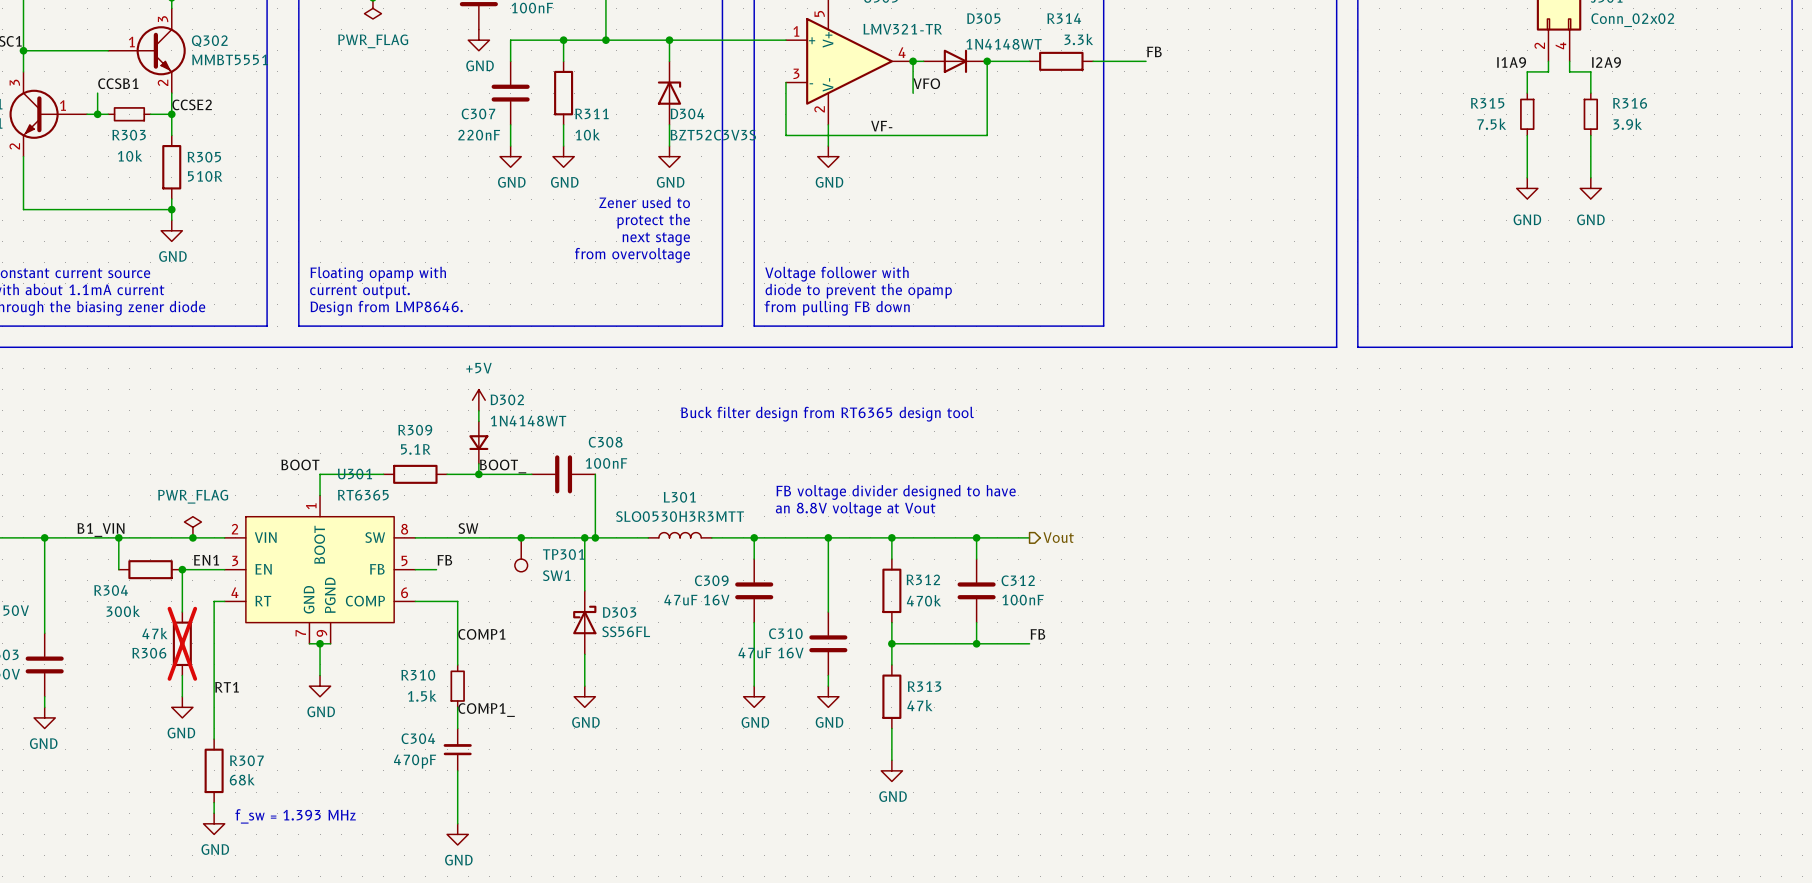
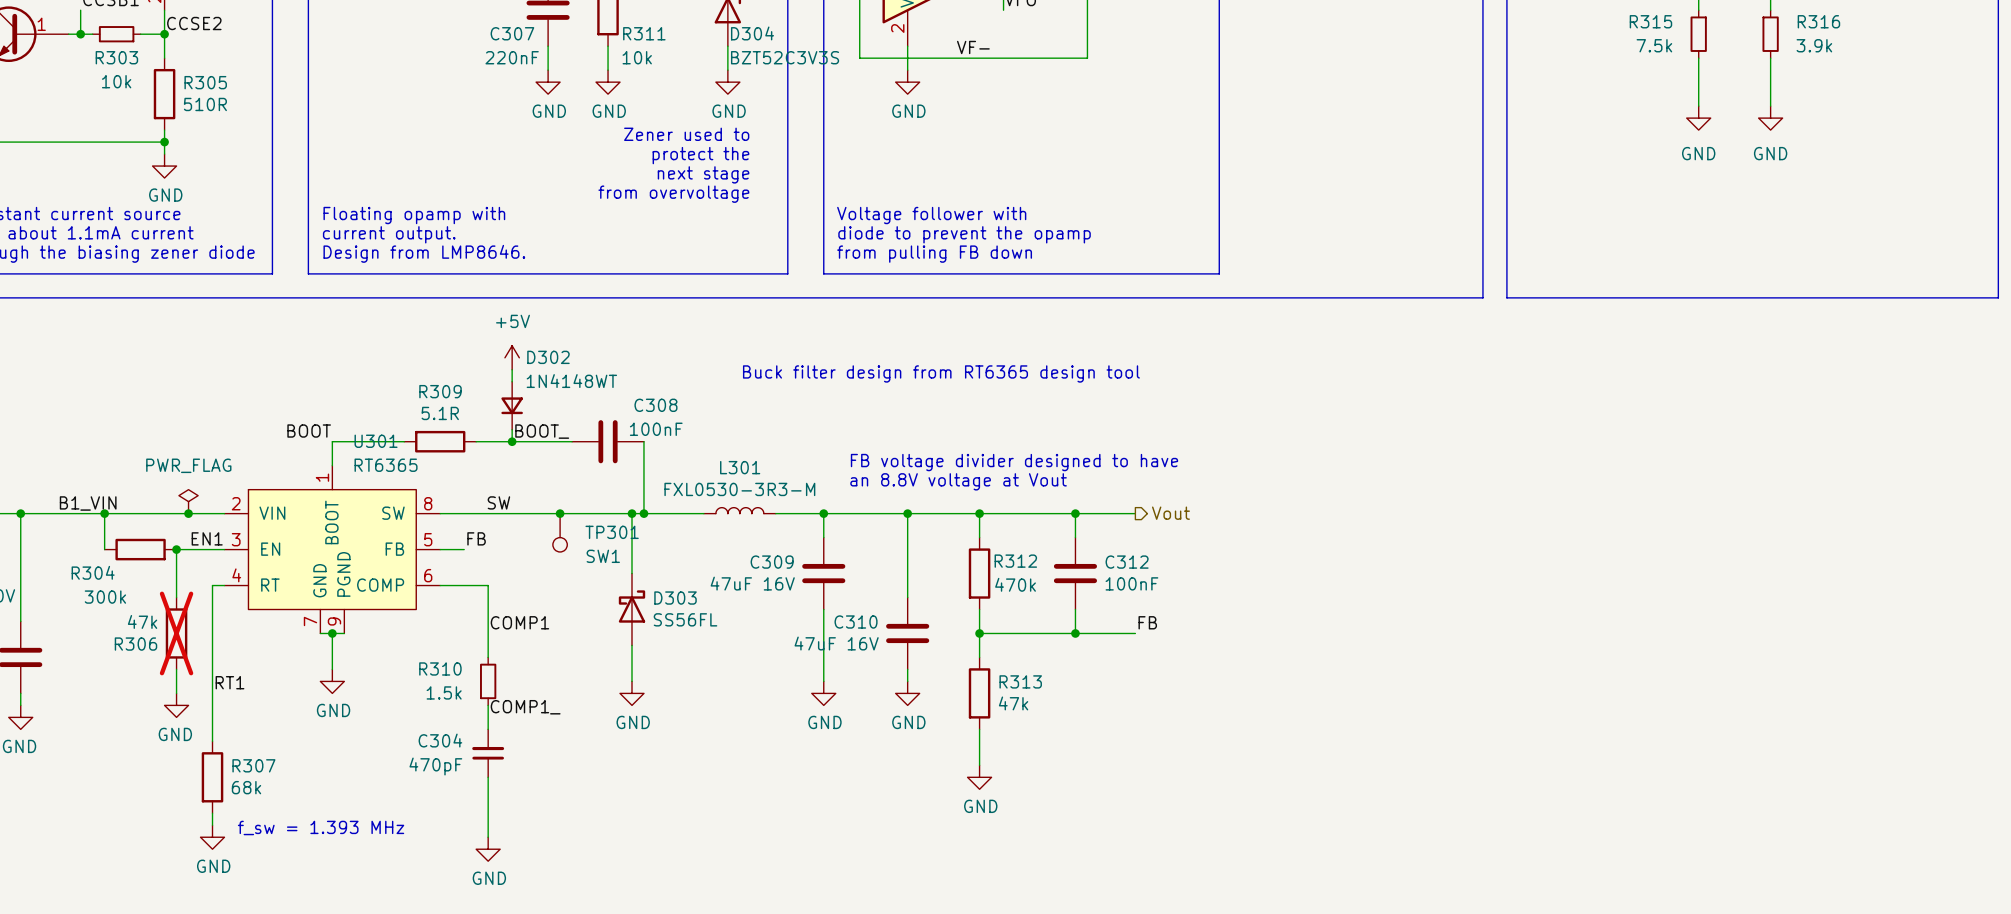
L301 value: SLO0530H3R3MTT (680, 516) -> FXL0530-3R3-M (739, 489)

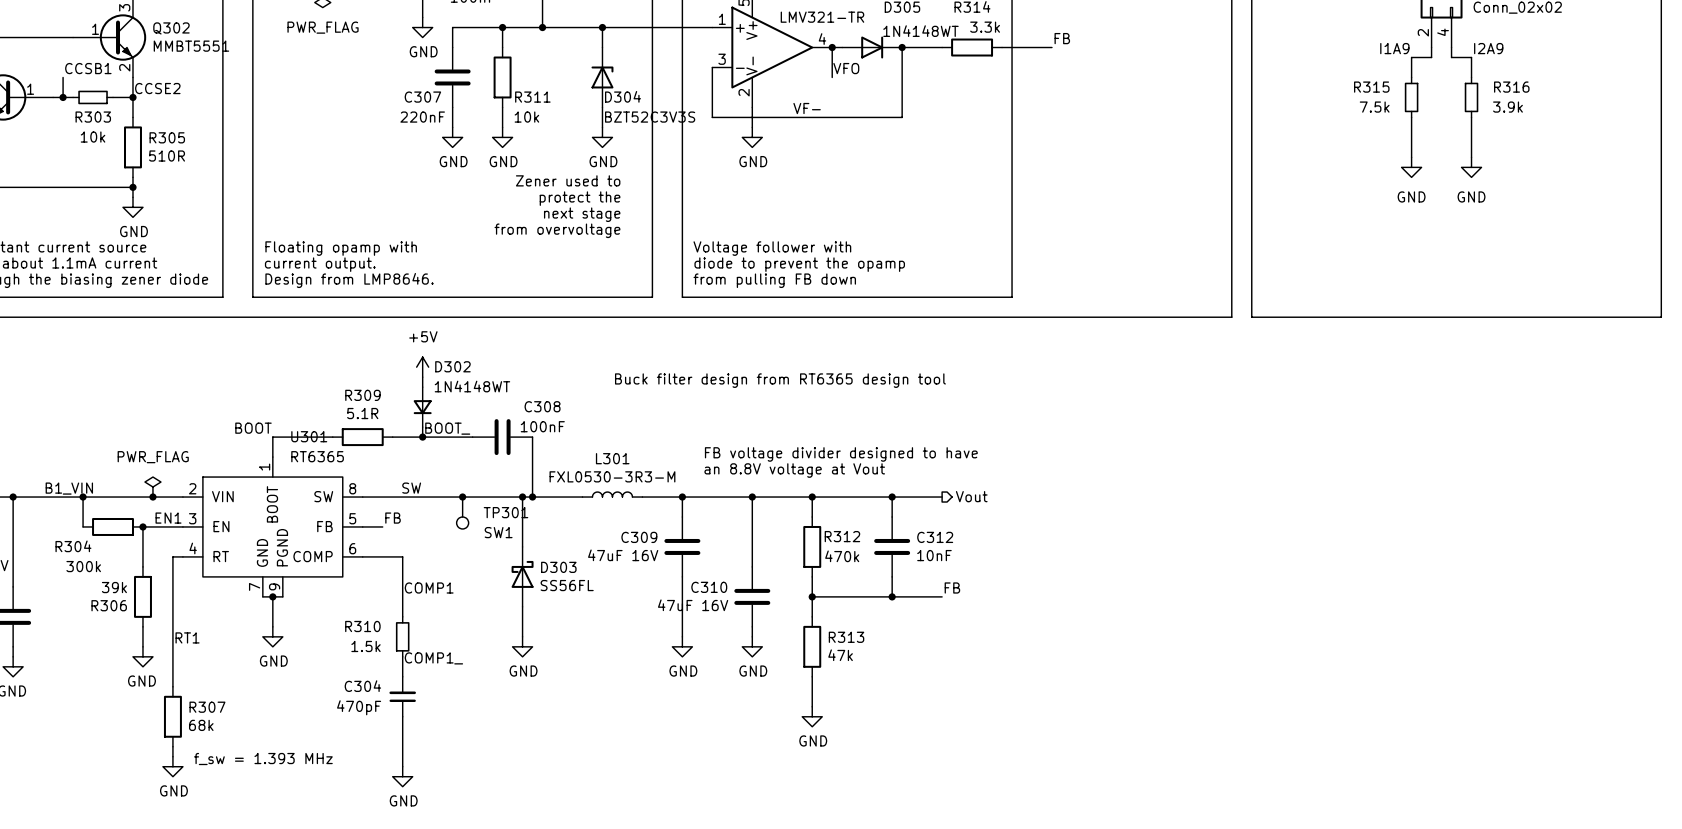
C312 value: 100nF (1131, 583) -> 10nF (934, 555)
R306 value: 47k (142, 621) -> 39k (114, 587)
R306 do-not-place cross: (176, 633) -> none

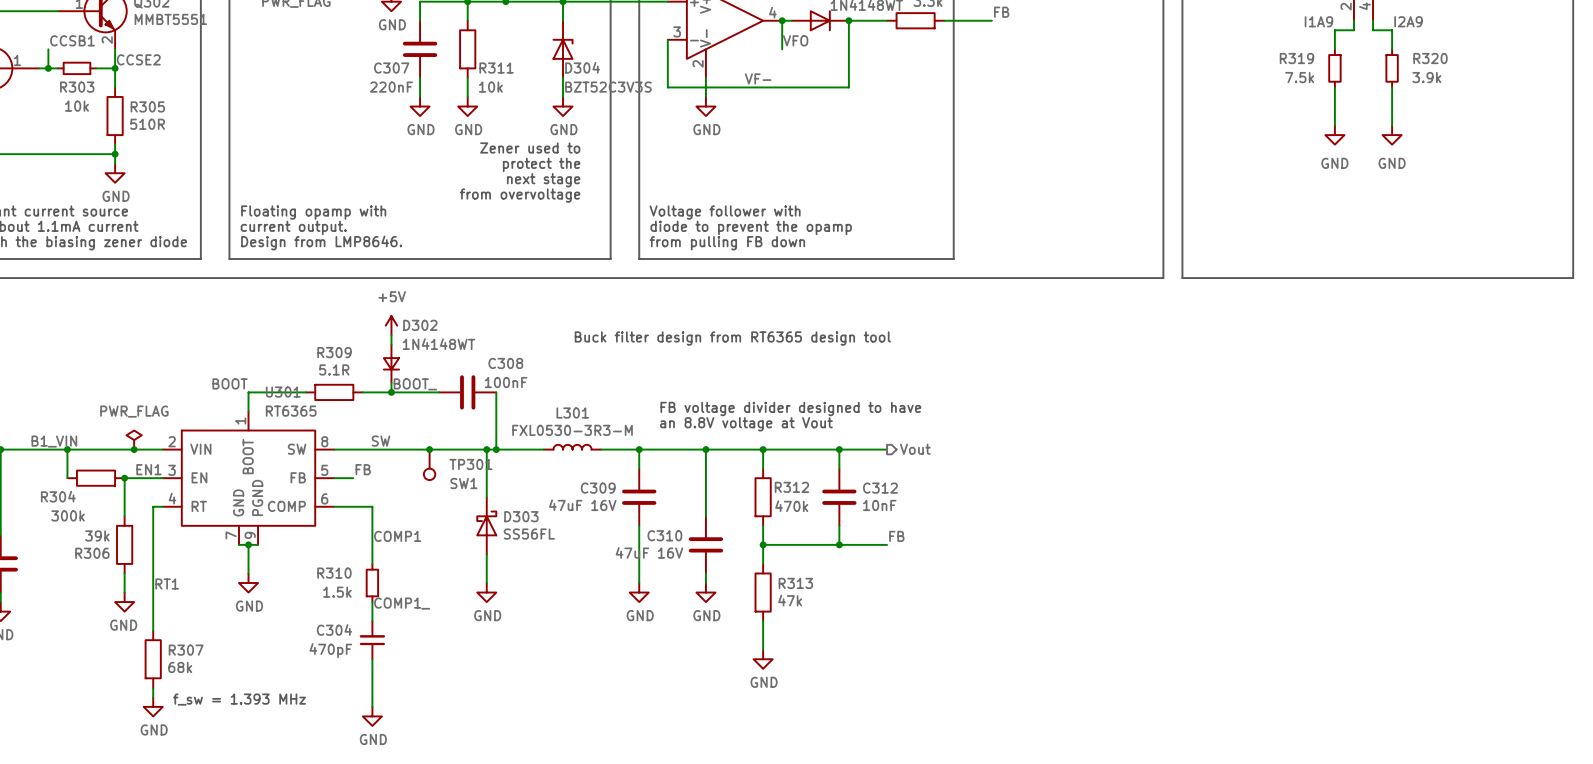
R315 name: R315 (1371, 87) -> R319 (1296, 58)
R316 name: R316 (1511, 87) -> R320 (1430, 58)

